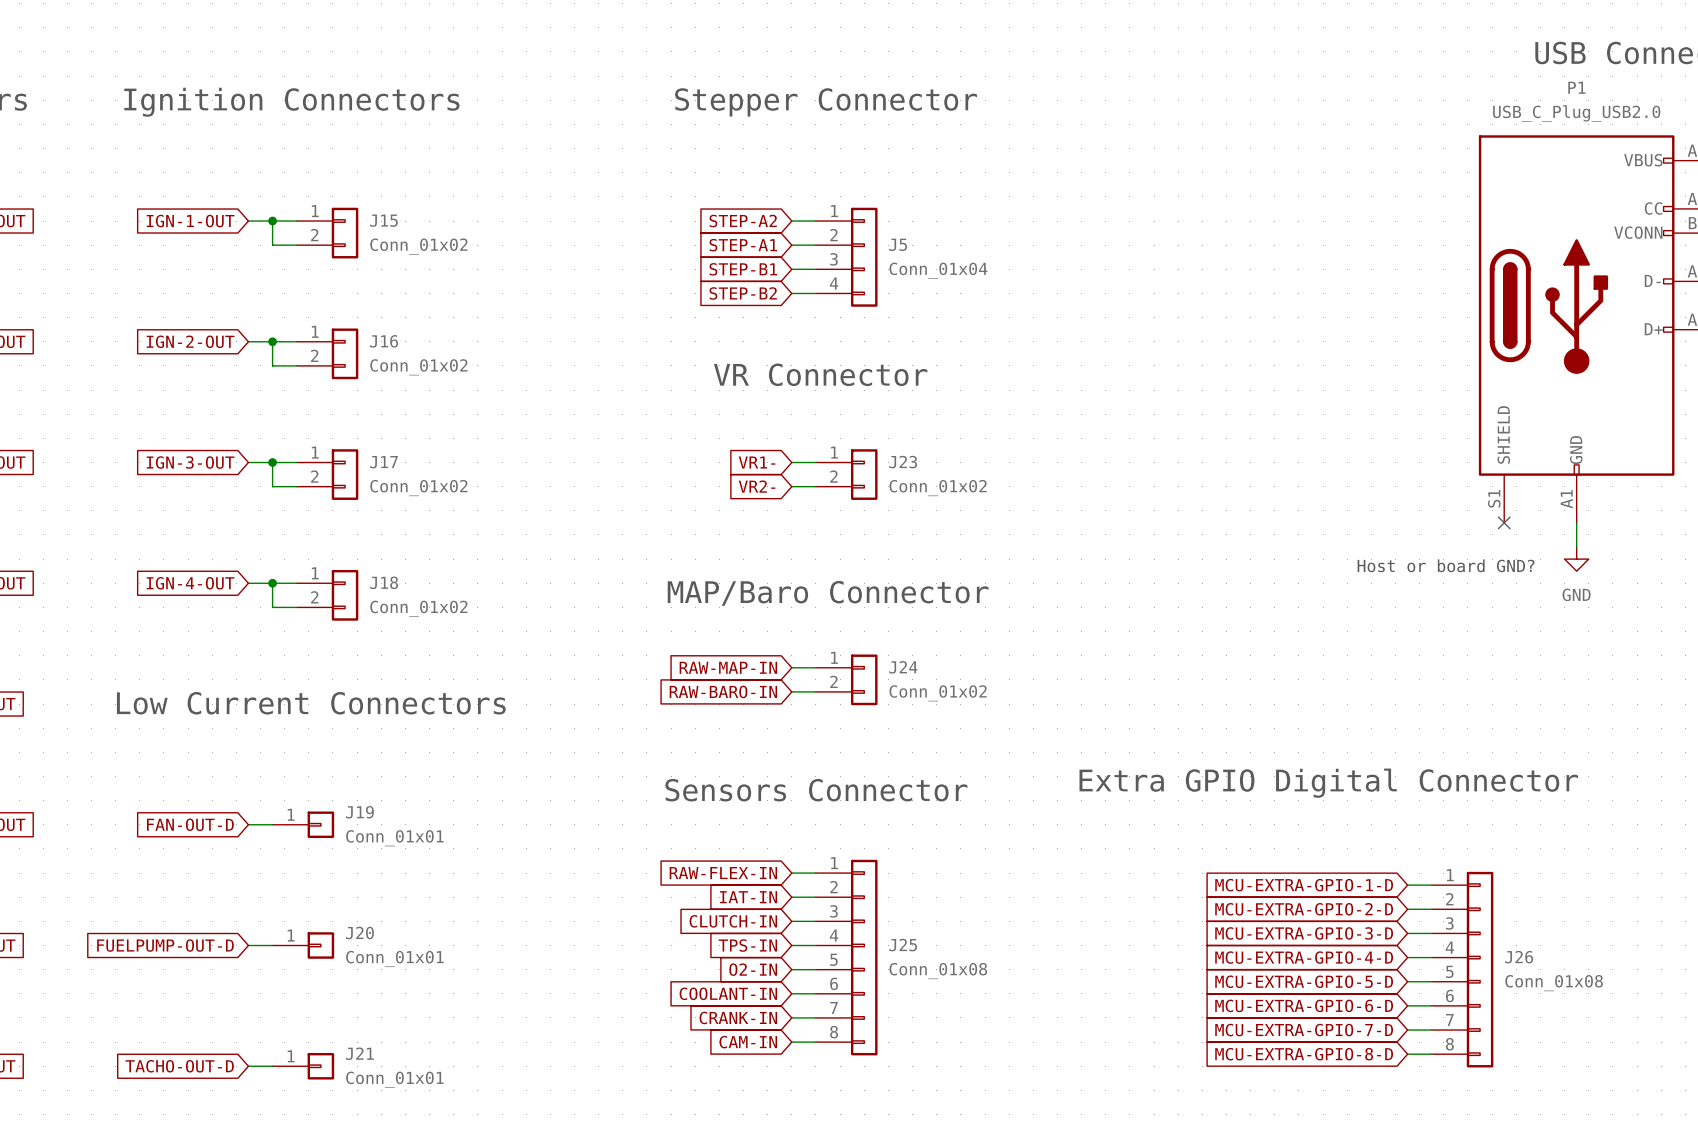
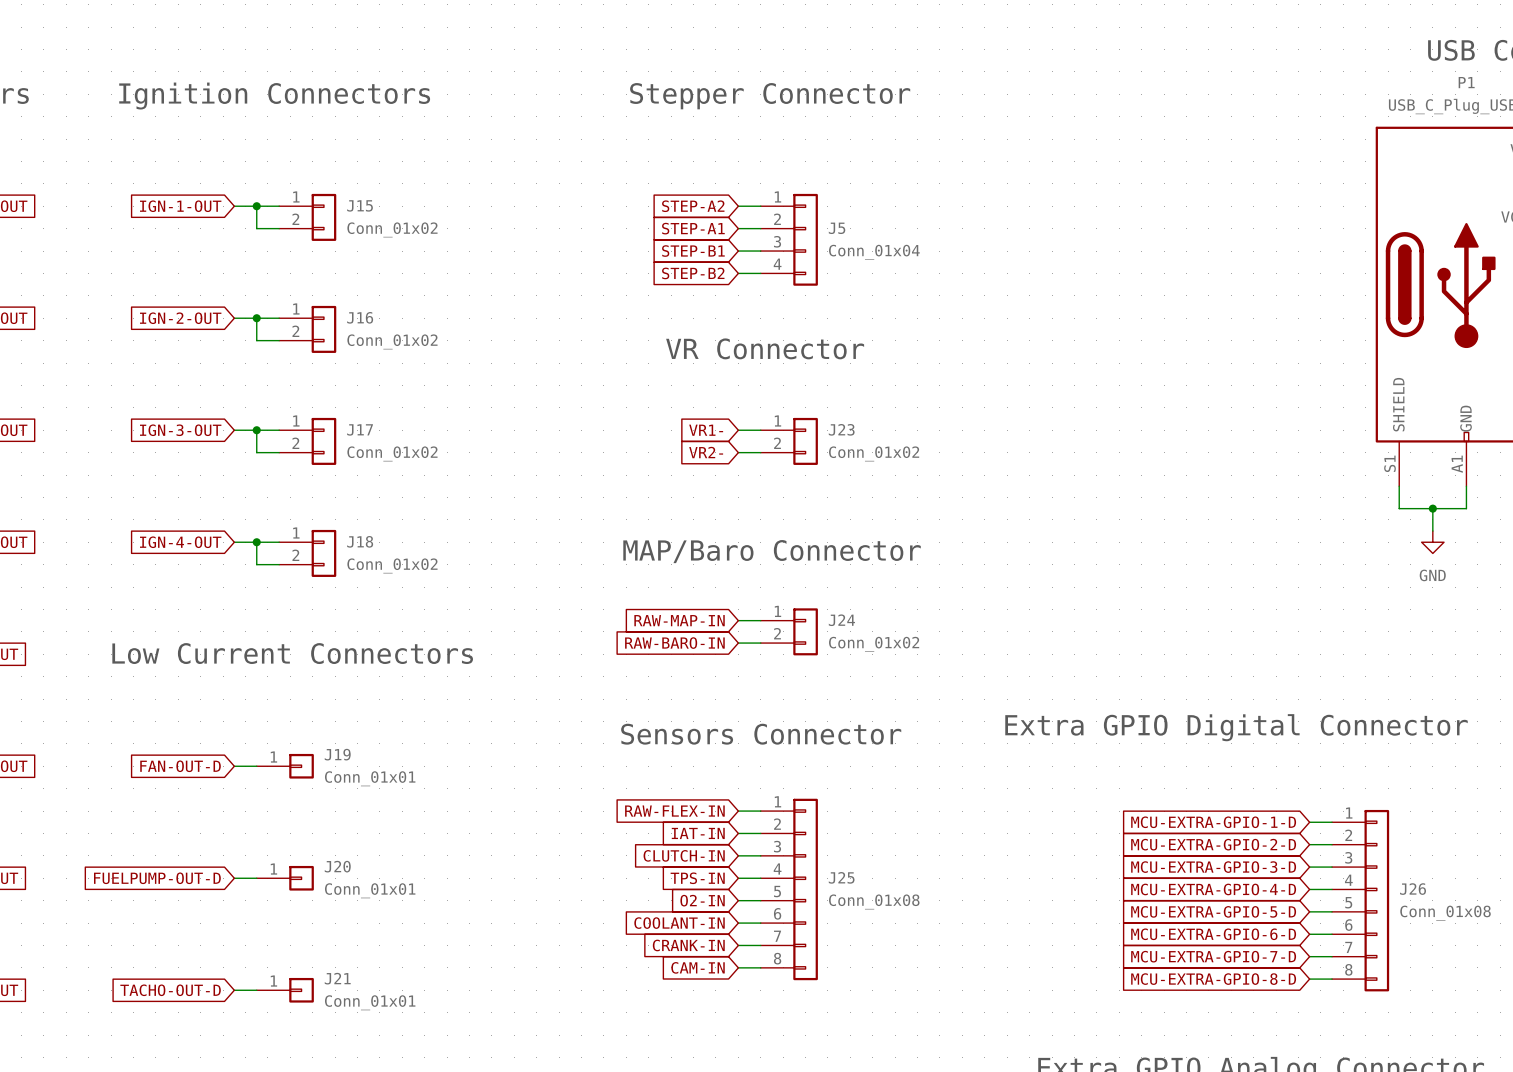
wire: none -> (1399, 486) (1399, 508) (1466, 508)
no-connect mark: (1504, 522) -> none
wire: none -> (1432, 508) (1432, 531)
junction: none -> (1432, 508)
power symbol position: GND (1576, 559) -> GND (1432, 542)
text: Host or board GND? (1446, 565) -> none

